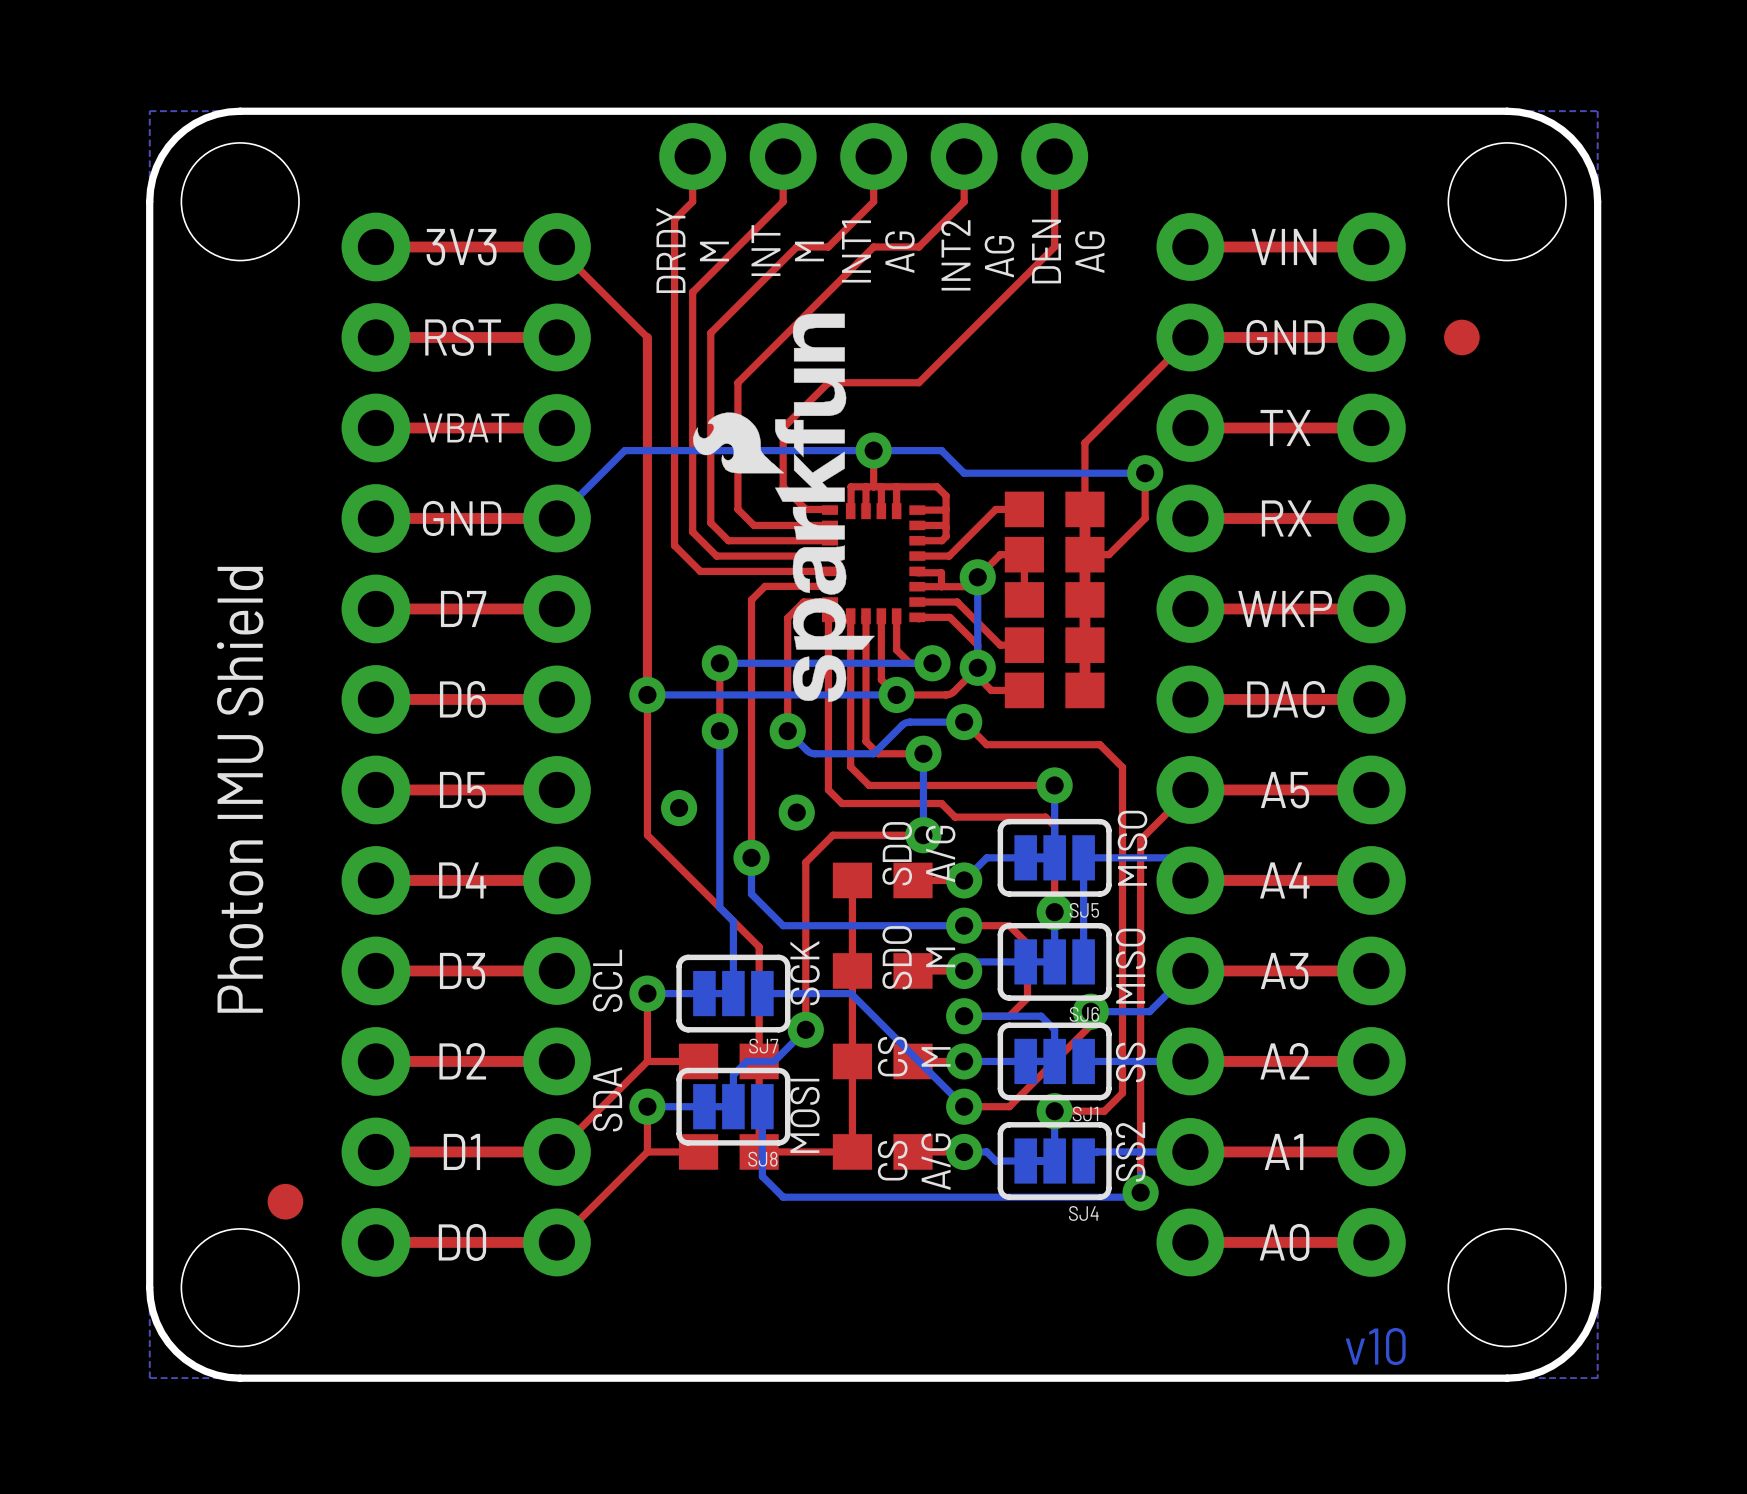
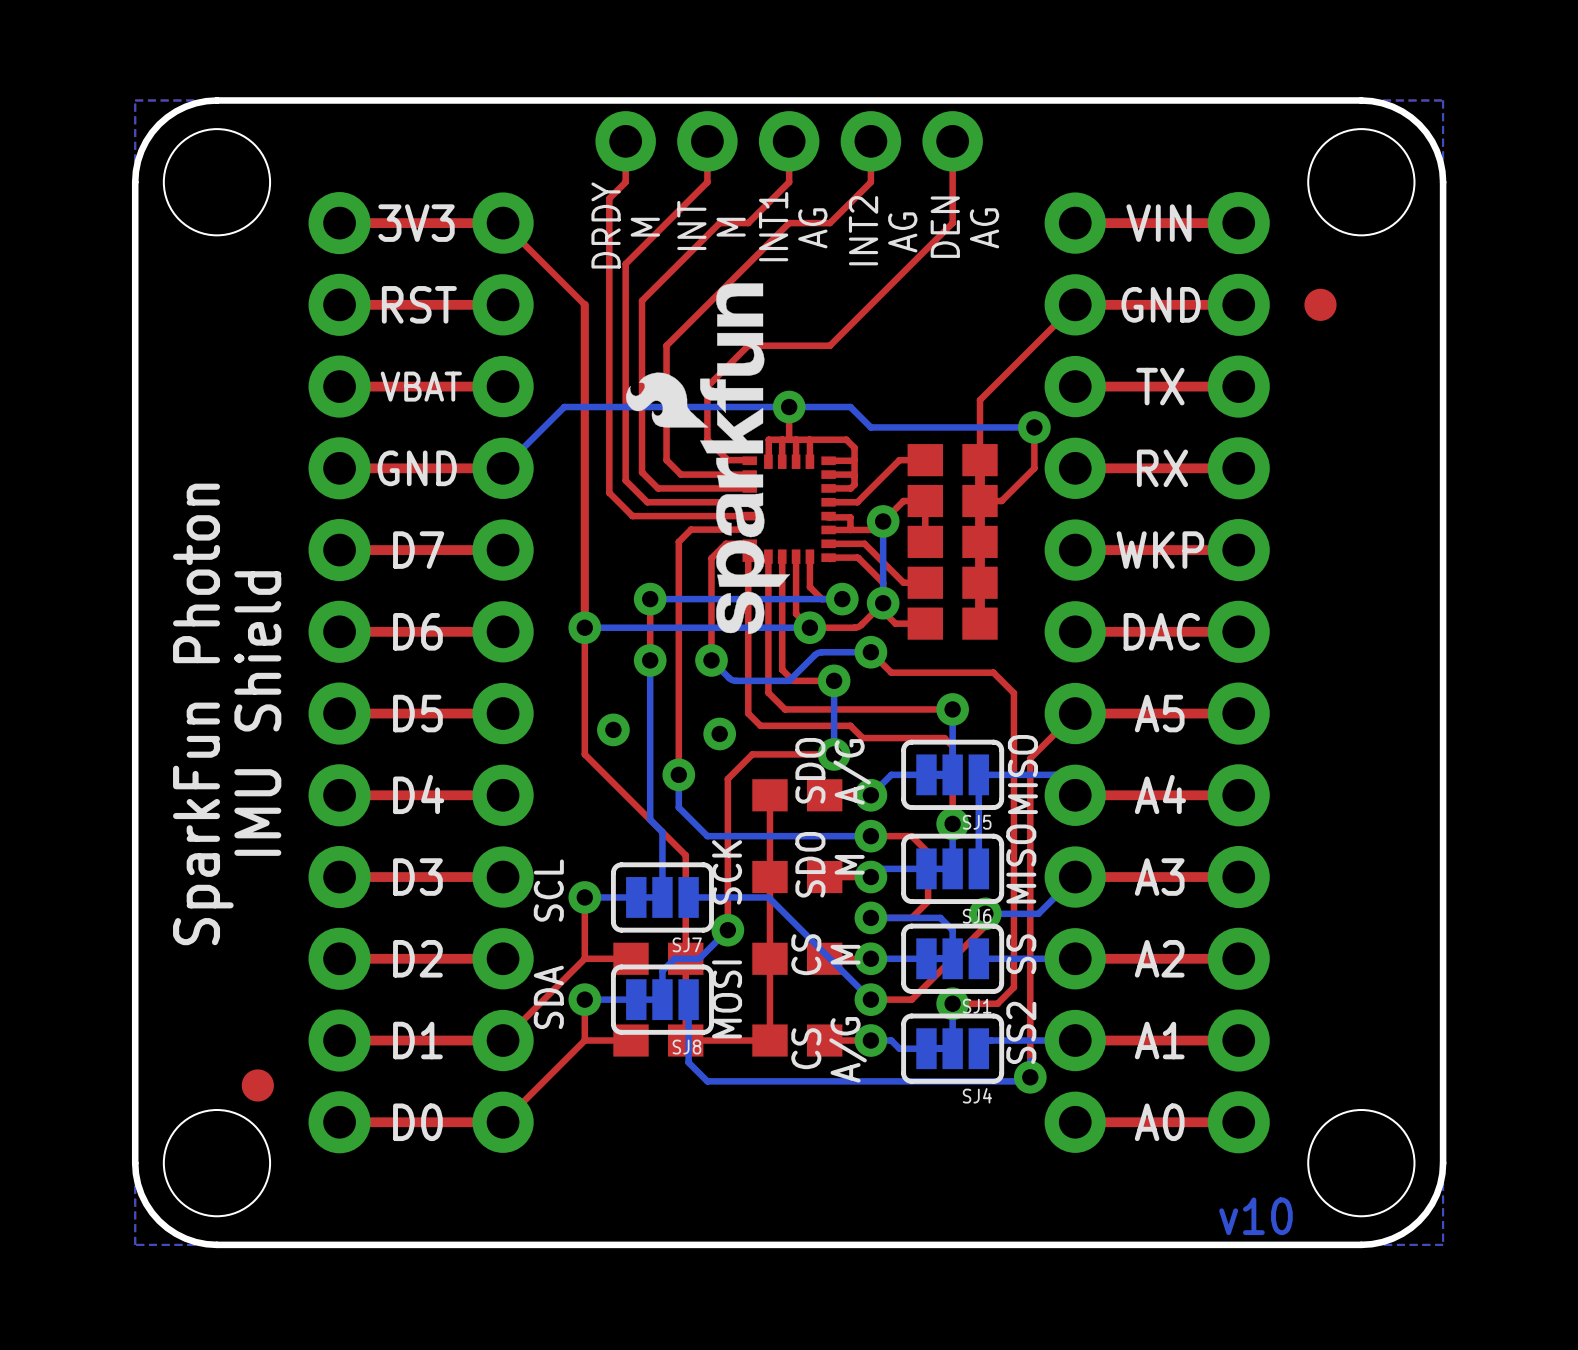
text: Photon IMU Shield (240, 789) -> IMU Shield (257, 713)
text: none -> SparkFun Photon (203, 714)

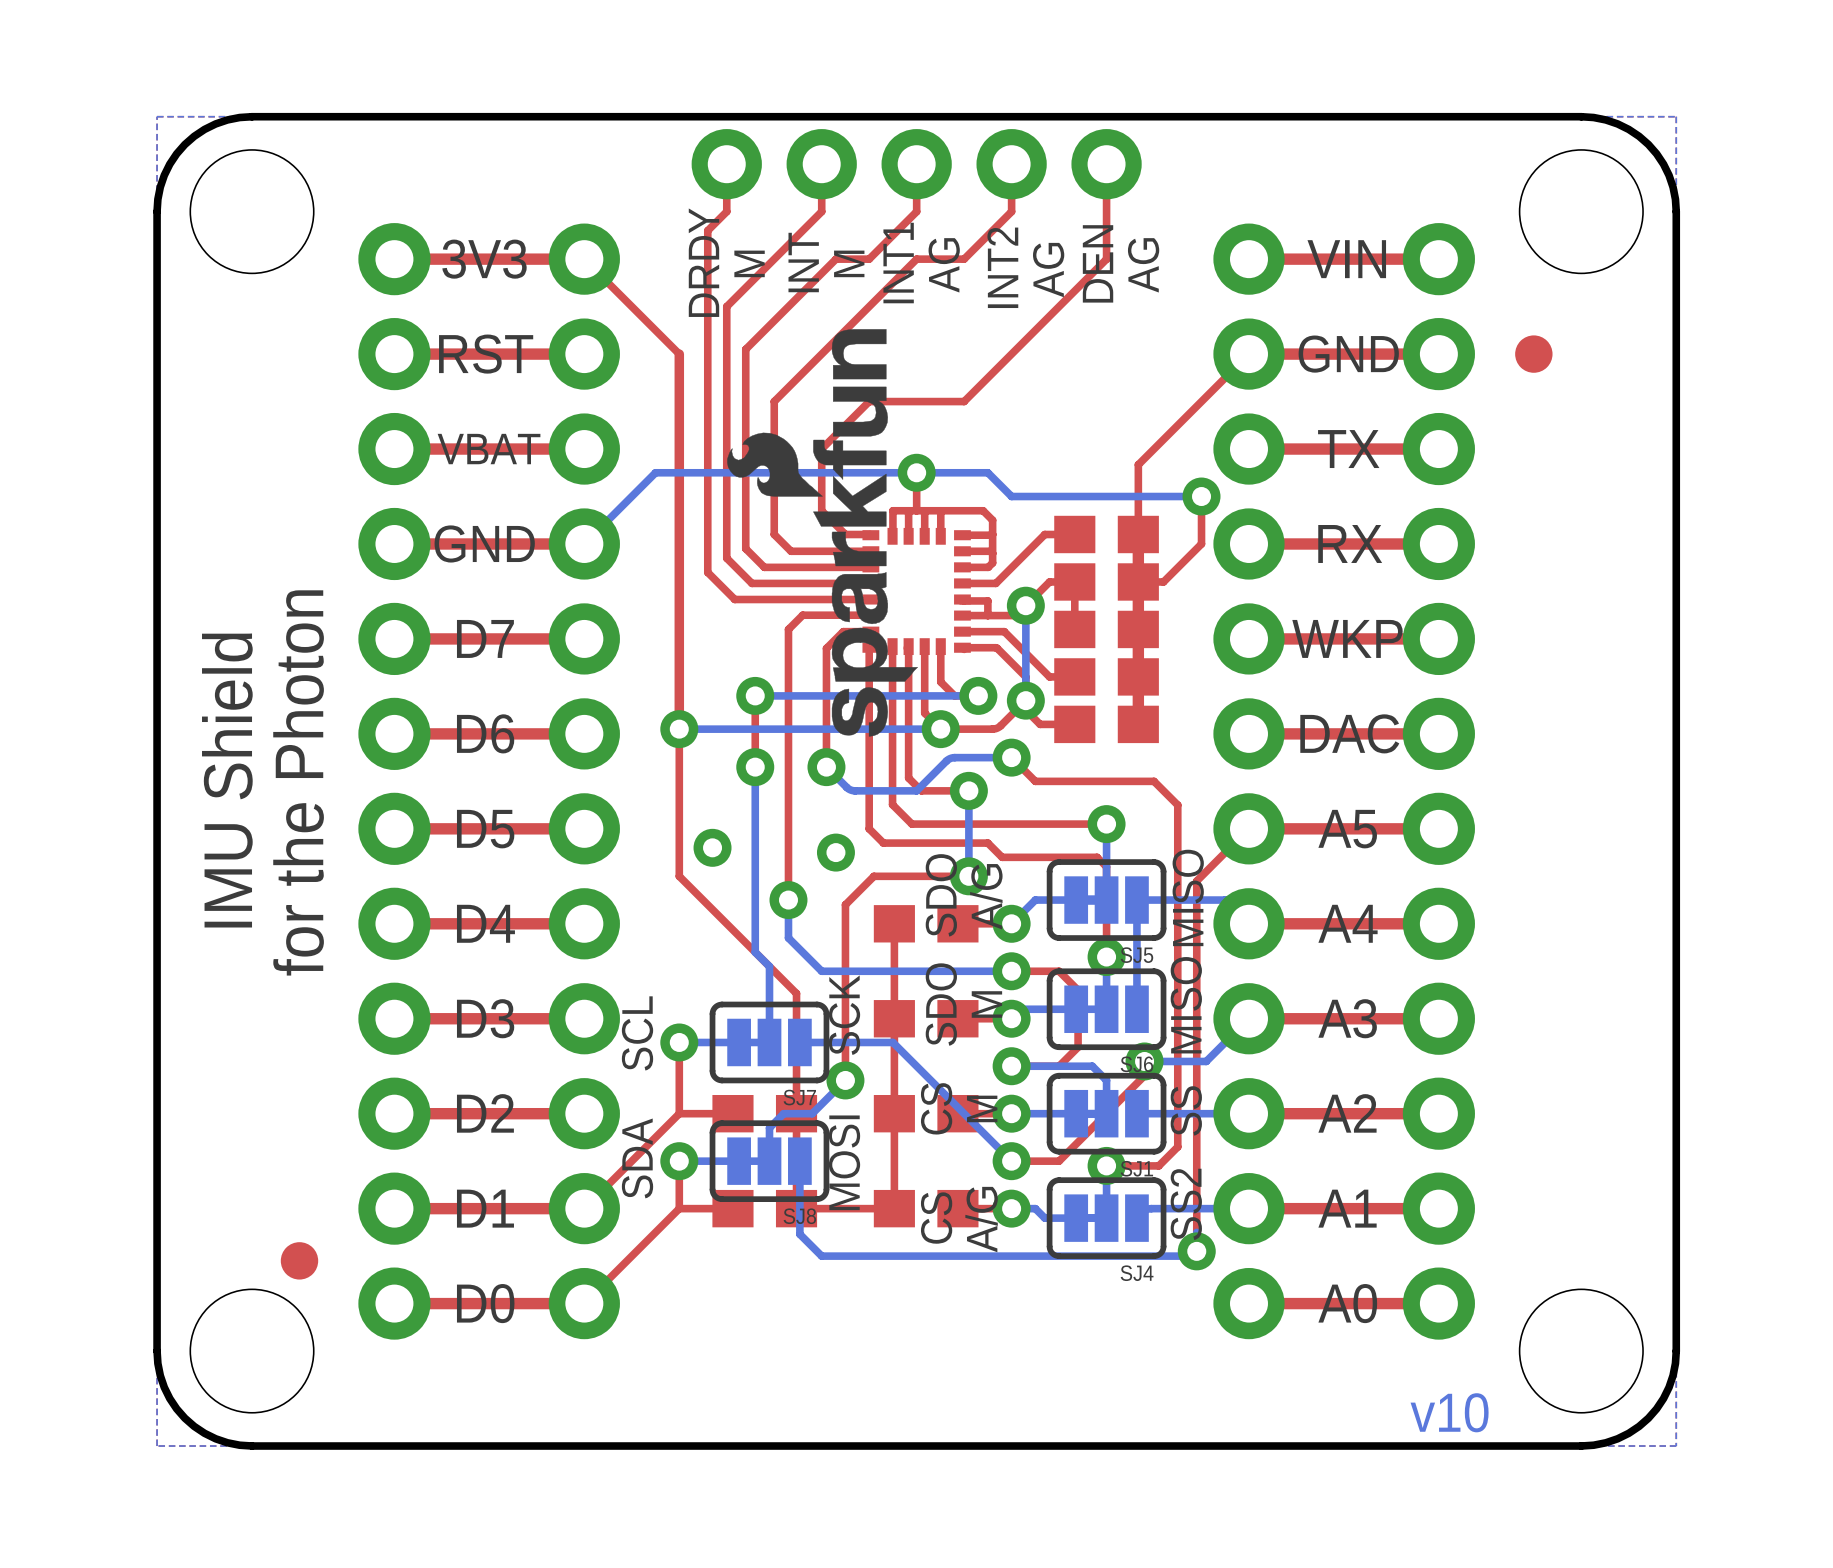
text: none -> for the Photon (298, 782)
text position: IMU Shield (257, 713) -> IMU Shield (227, 780)
text: SparkFun Photon (203, 714) -> none

